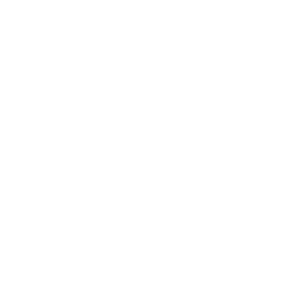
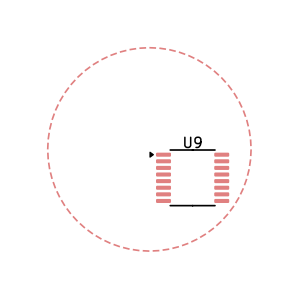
top zone outline: none -> (149, 47) (129, 49) (110, 55) (92, 64) (77, 77) (64, 92) (55, 110) (49, 129) (47, 149) (49, 169) (55, 188) (64, 205) (77, 221) (92, 233) (110, 243) (129, 249) (149, 251) (169, 249) (188, 243) (205, 233) (221, 221) (233, 205) (243, 188) (249, 169) (251, 149) (249, 129) (243, 110) (233, 92) (221, 77) (205, 64) (188, 55) (169, 49) (149, 47)
U9: none -> (189, 177)

